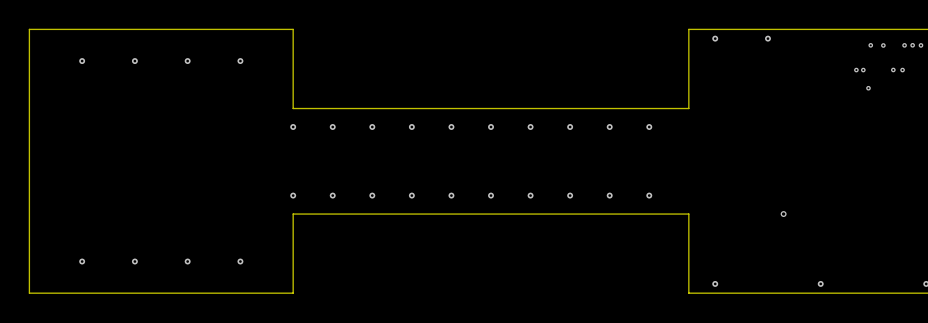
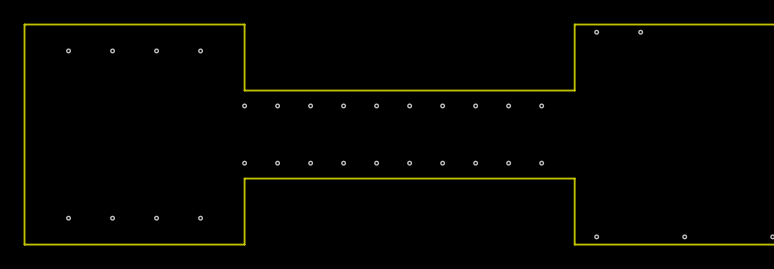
via: (870, 45) -> none
via: (883, 45) -> none
via: (904, 45) -> none
via: (912, 45) -> none
via: (920, 45) -> none
via: (893, 69) -> none
via: (856, 70) -> none
via: (863, 70) -> none
via: (902, 70) -> none
via: (868, 88) -> none
via: (783, 214) -> none

